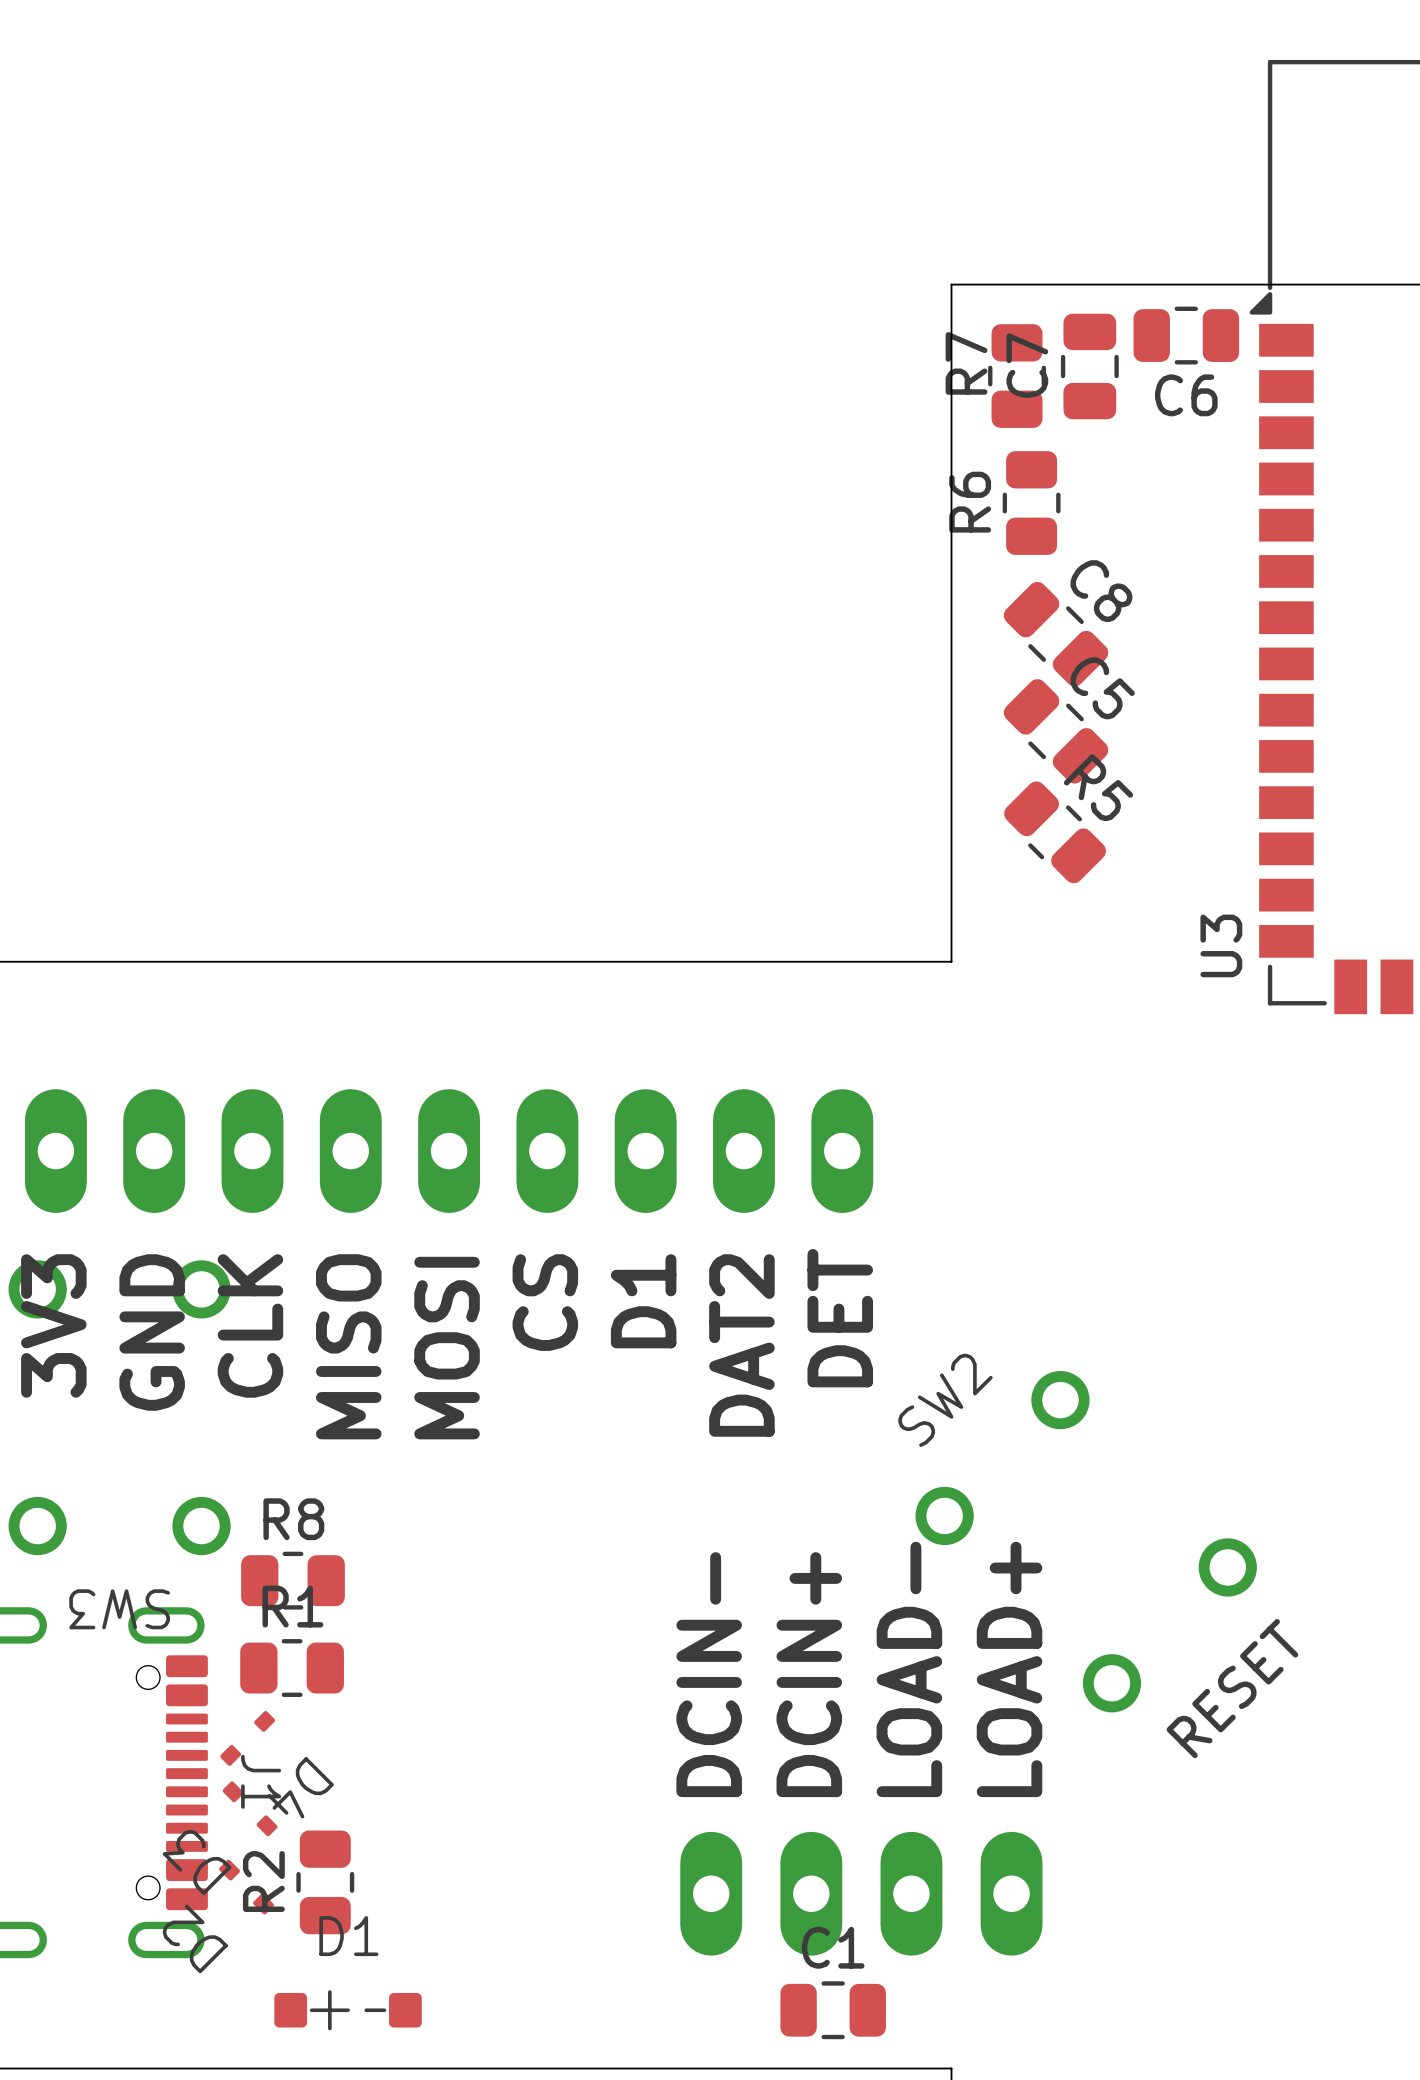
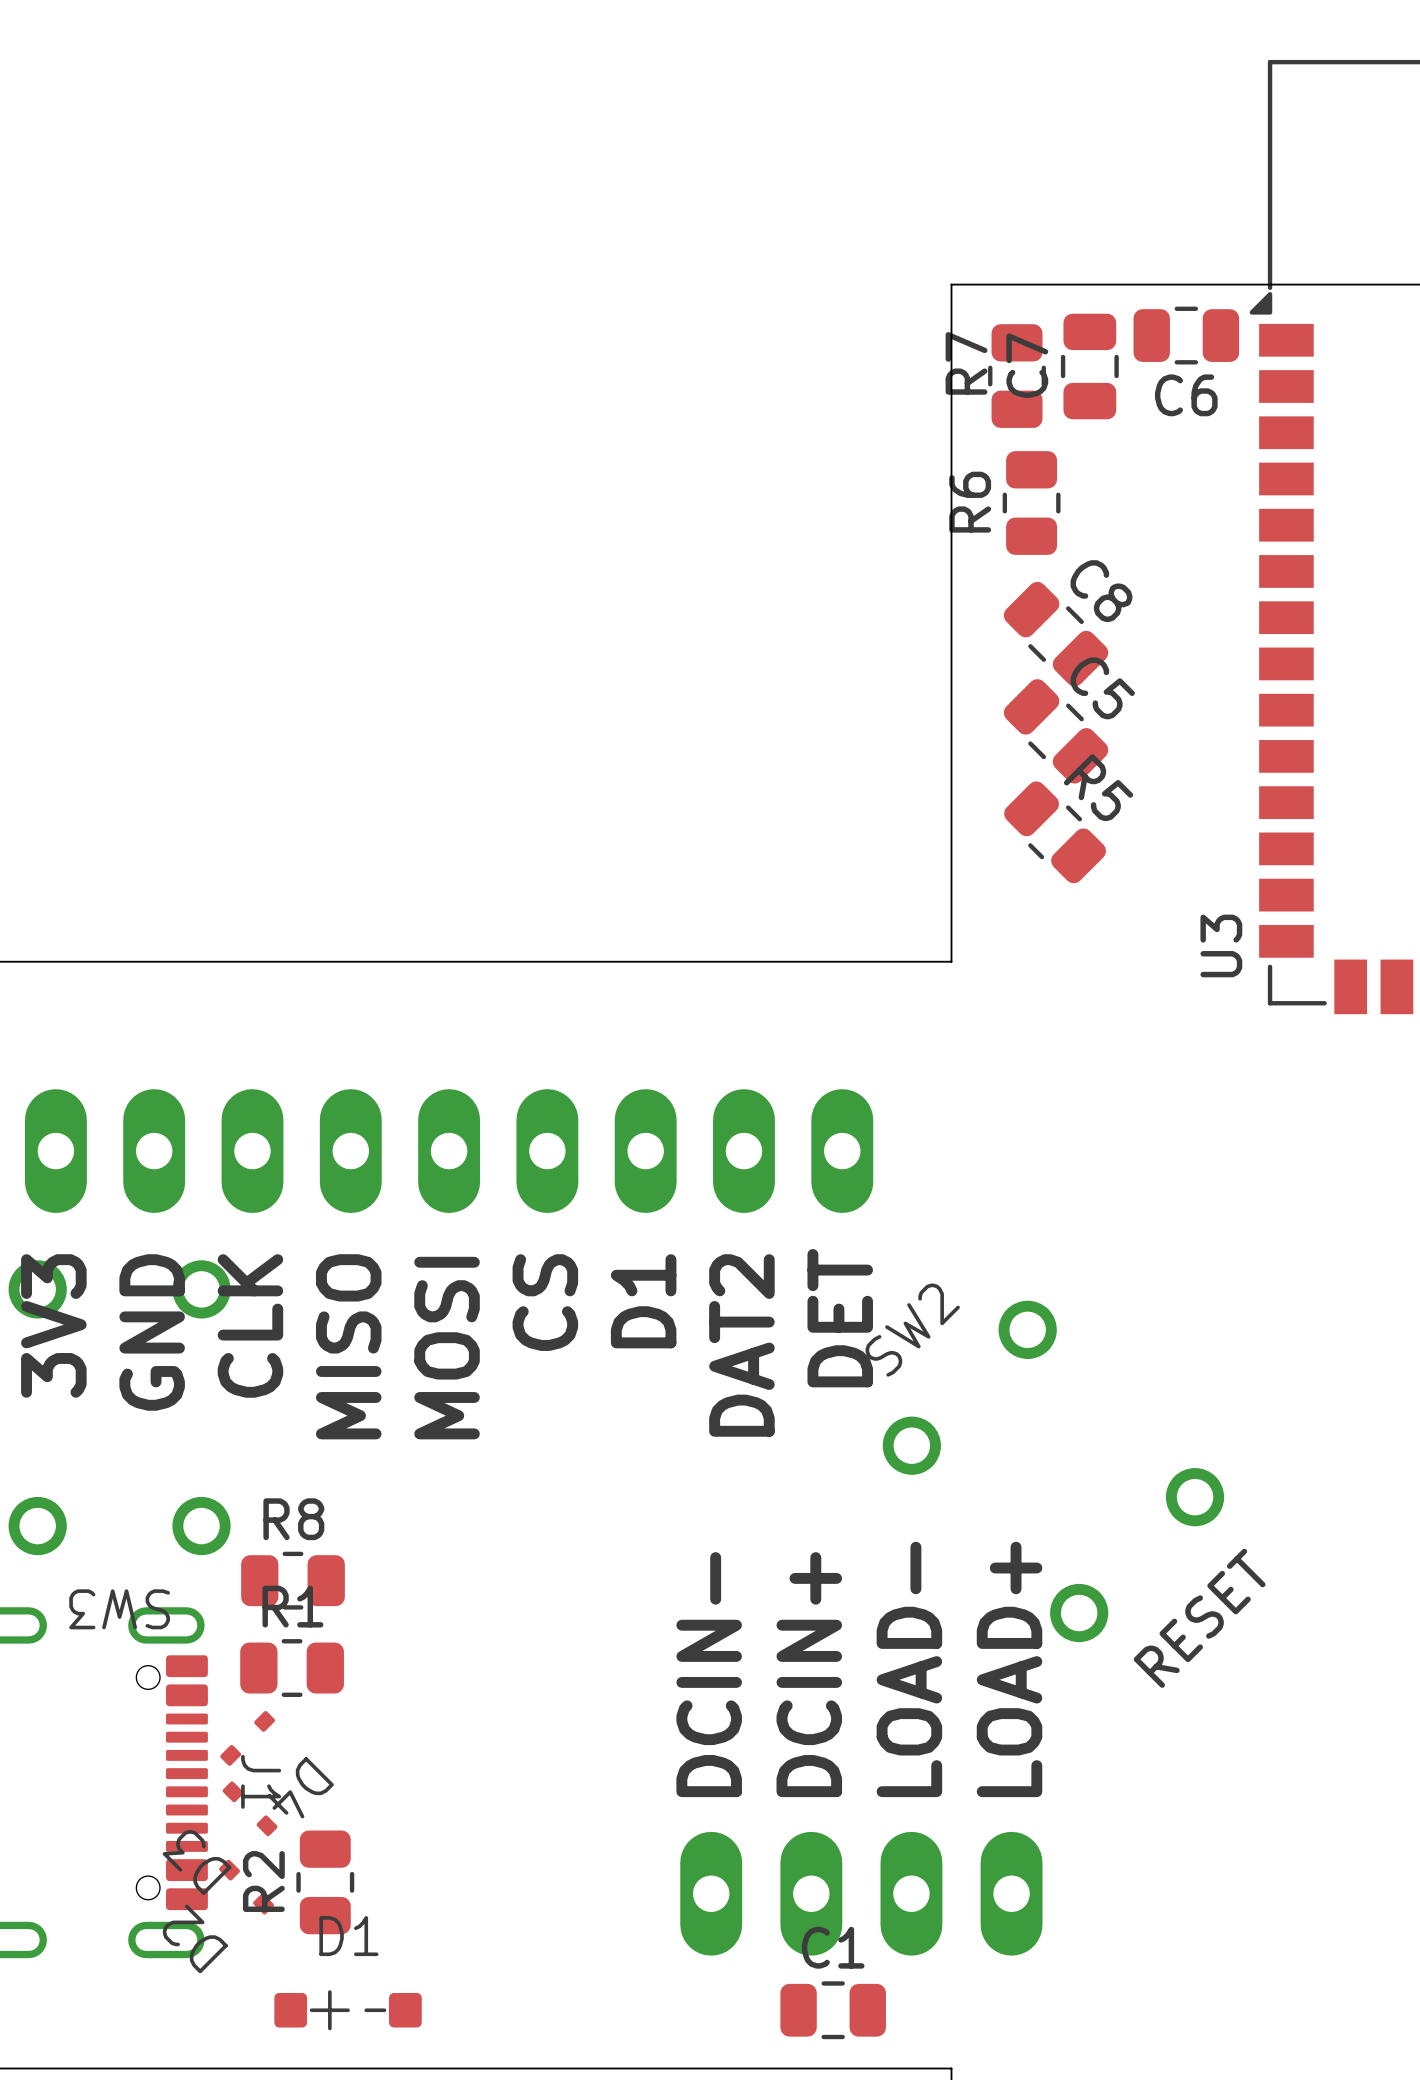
SW2 position: (1086, 1541) -> (1053, 1471)
text position: RESET (1232, 1688) -> RESET (1199, 1618)

